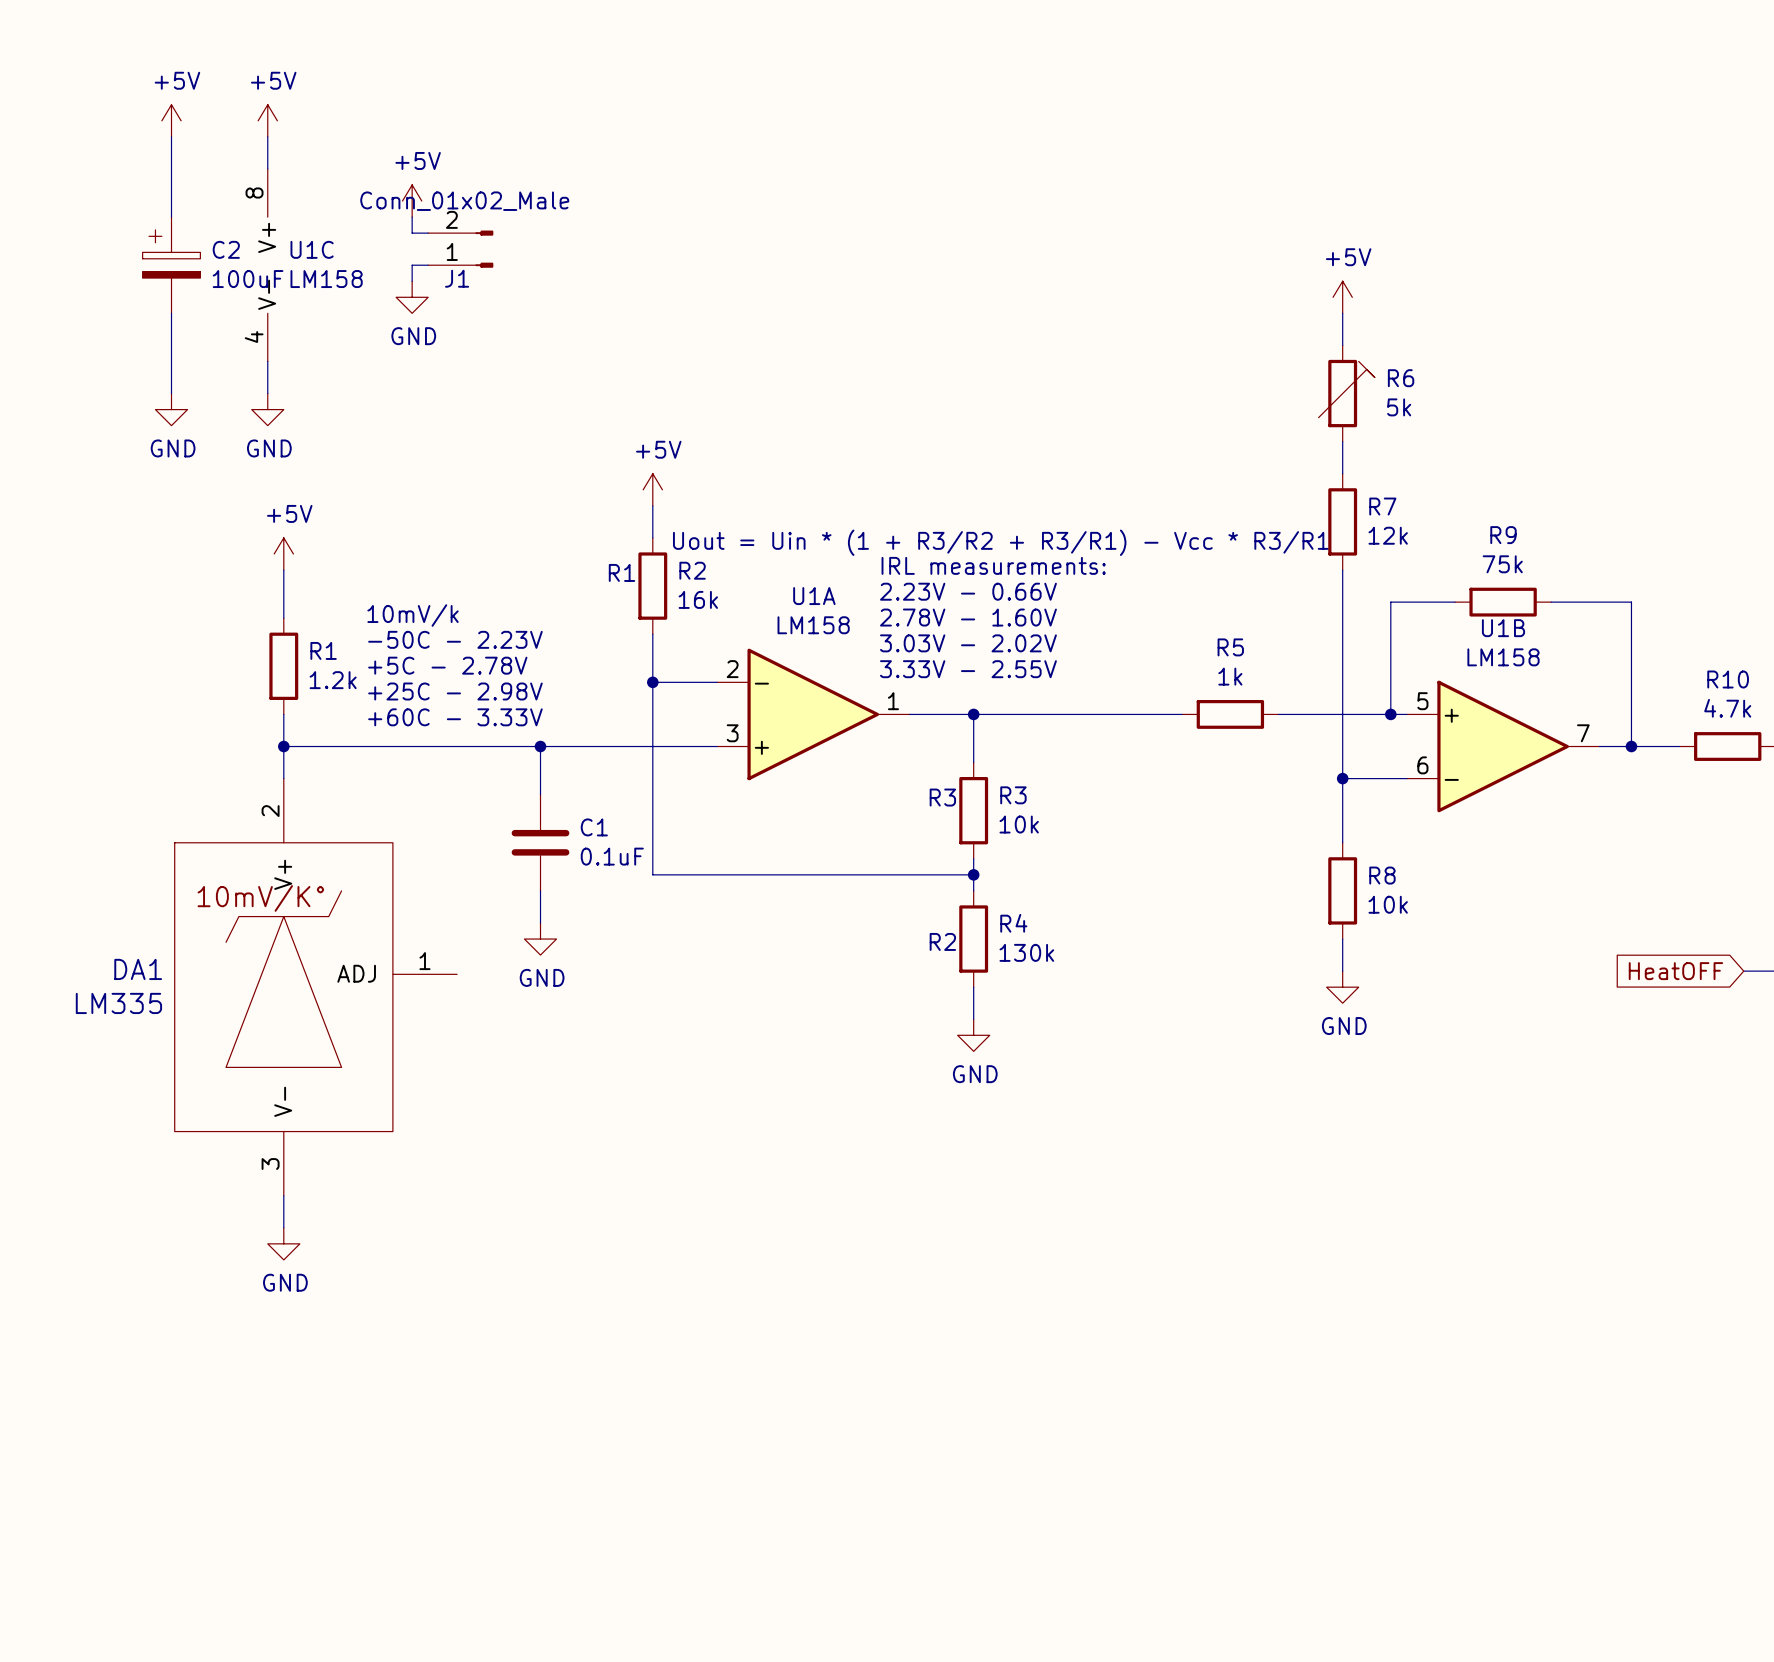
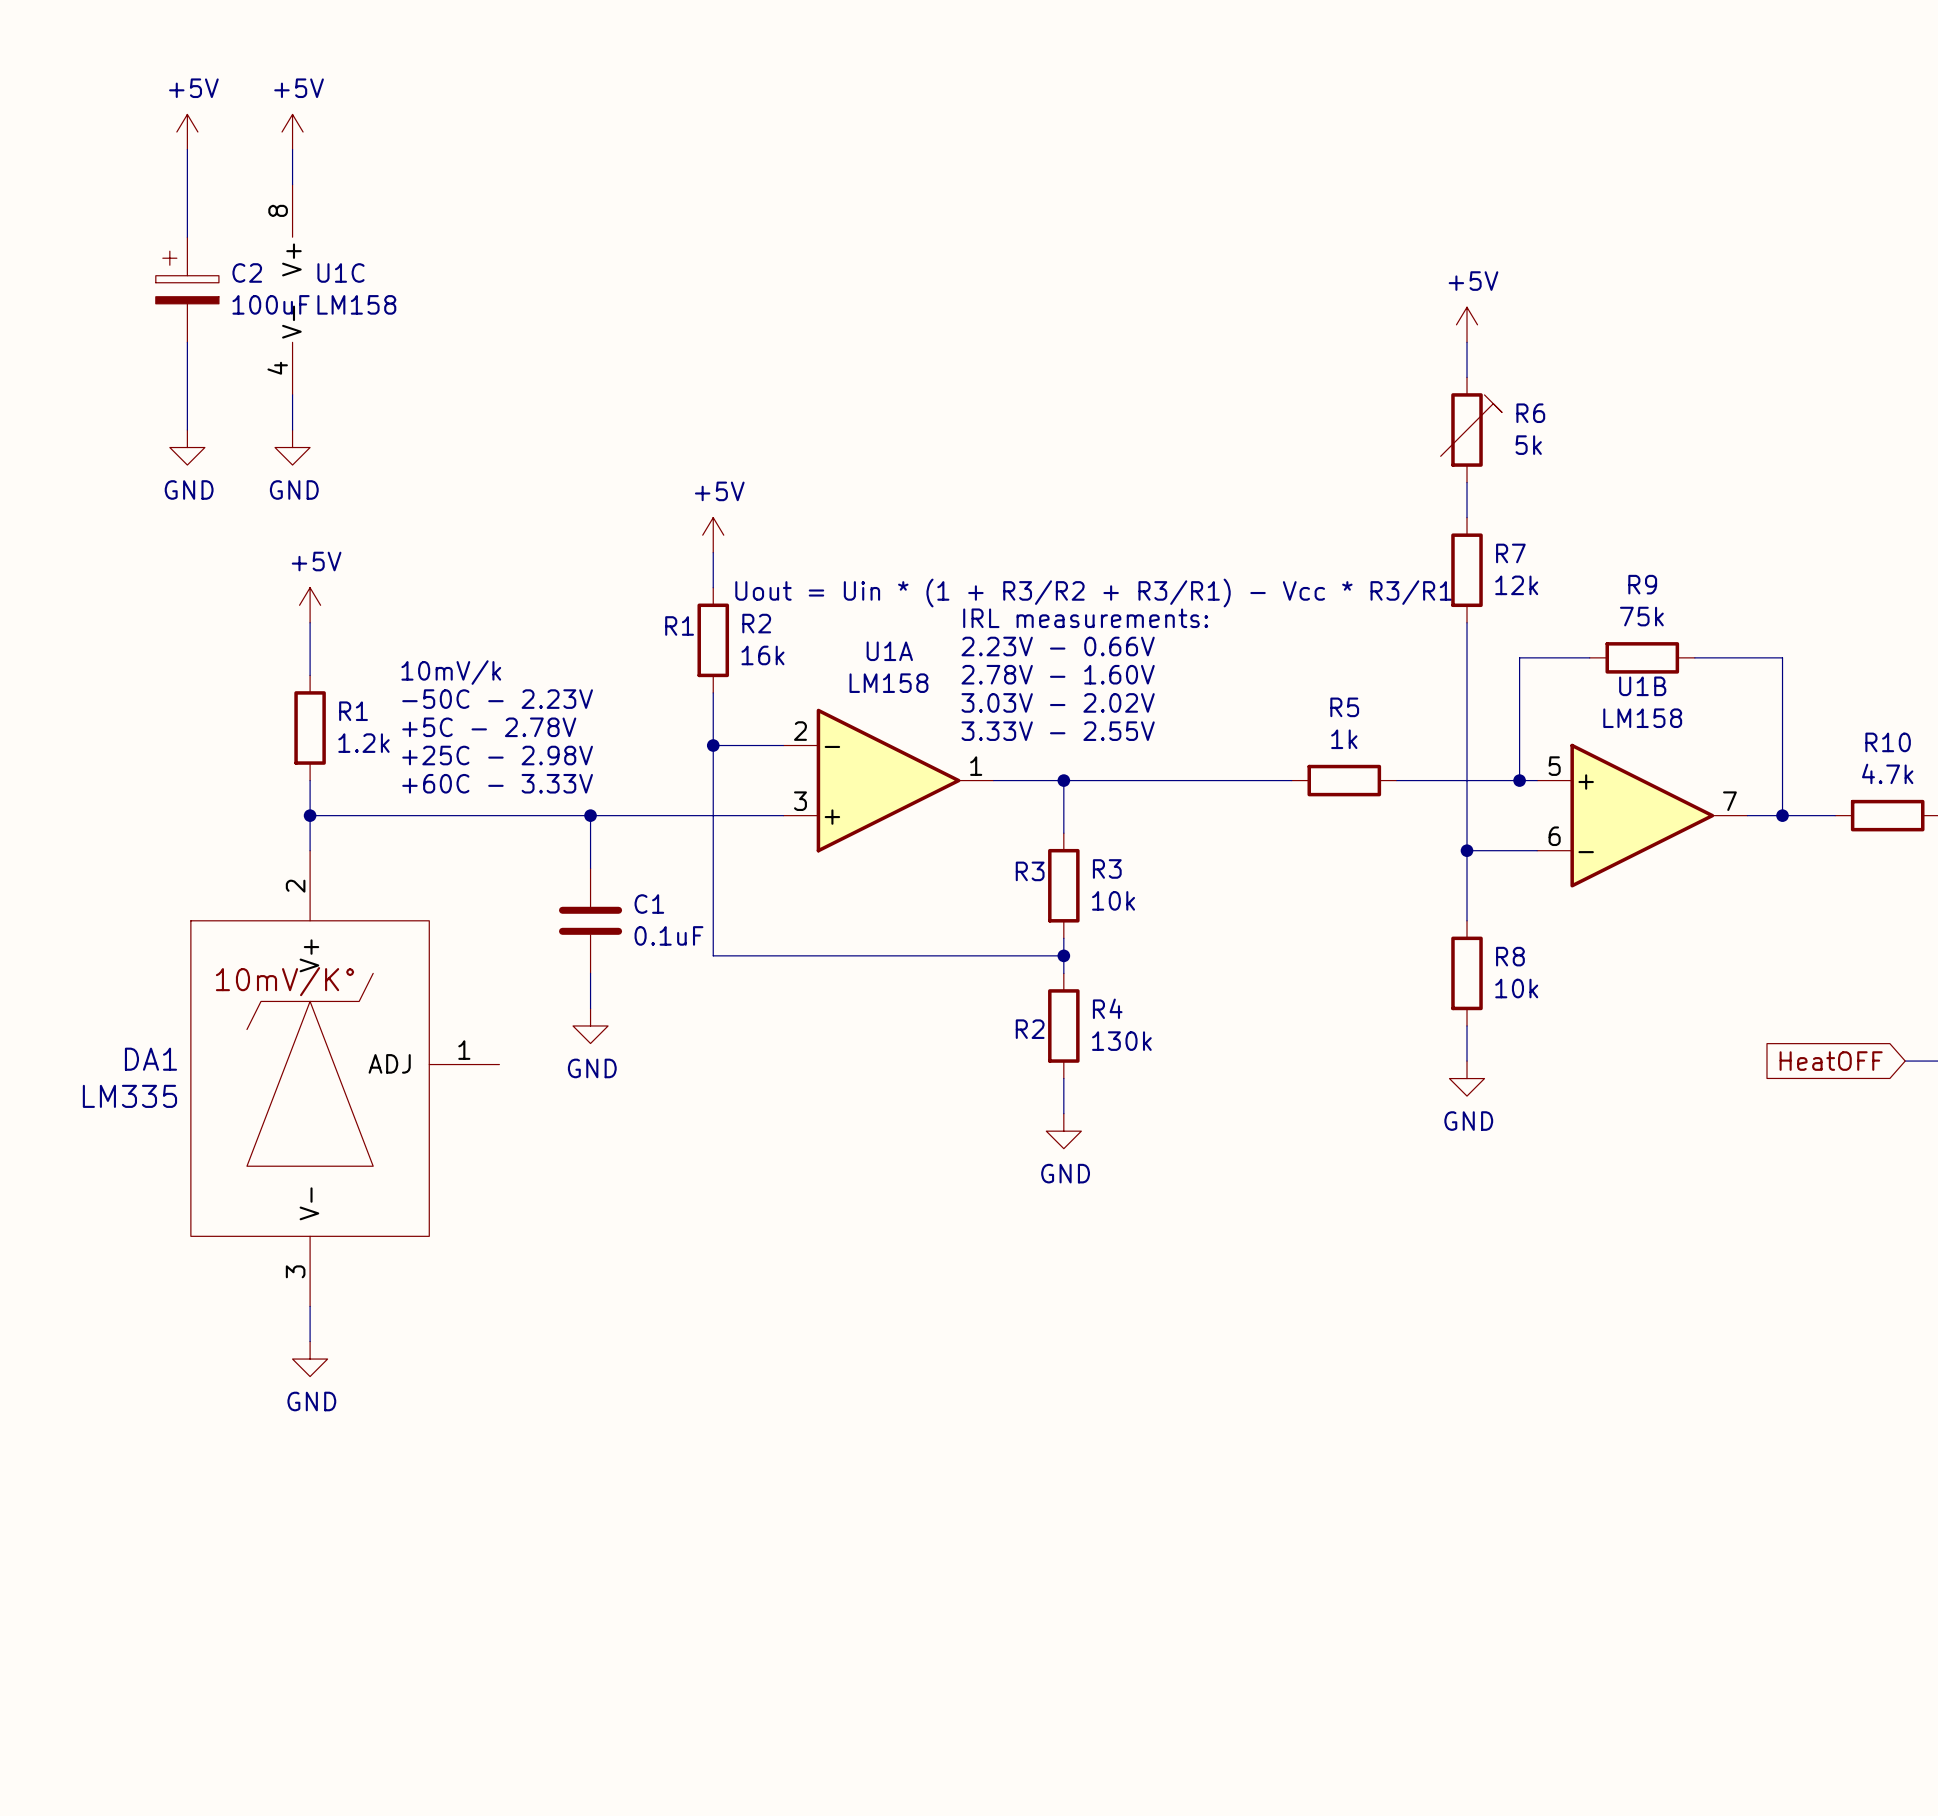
power symbol: +5V (412, 201) -> none
wire: (412, 217) (412, 233) (428, 233) -> none
J1: Conn_01x02_Male (460, 249) -> none
wire: (428, 265) (412, 265) (412, 281) -> none
power symbol: GND (412, 297) -> none

